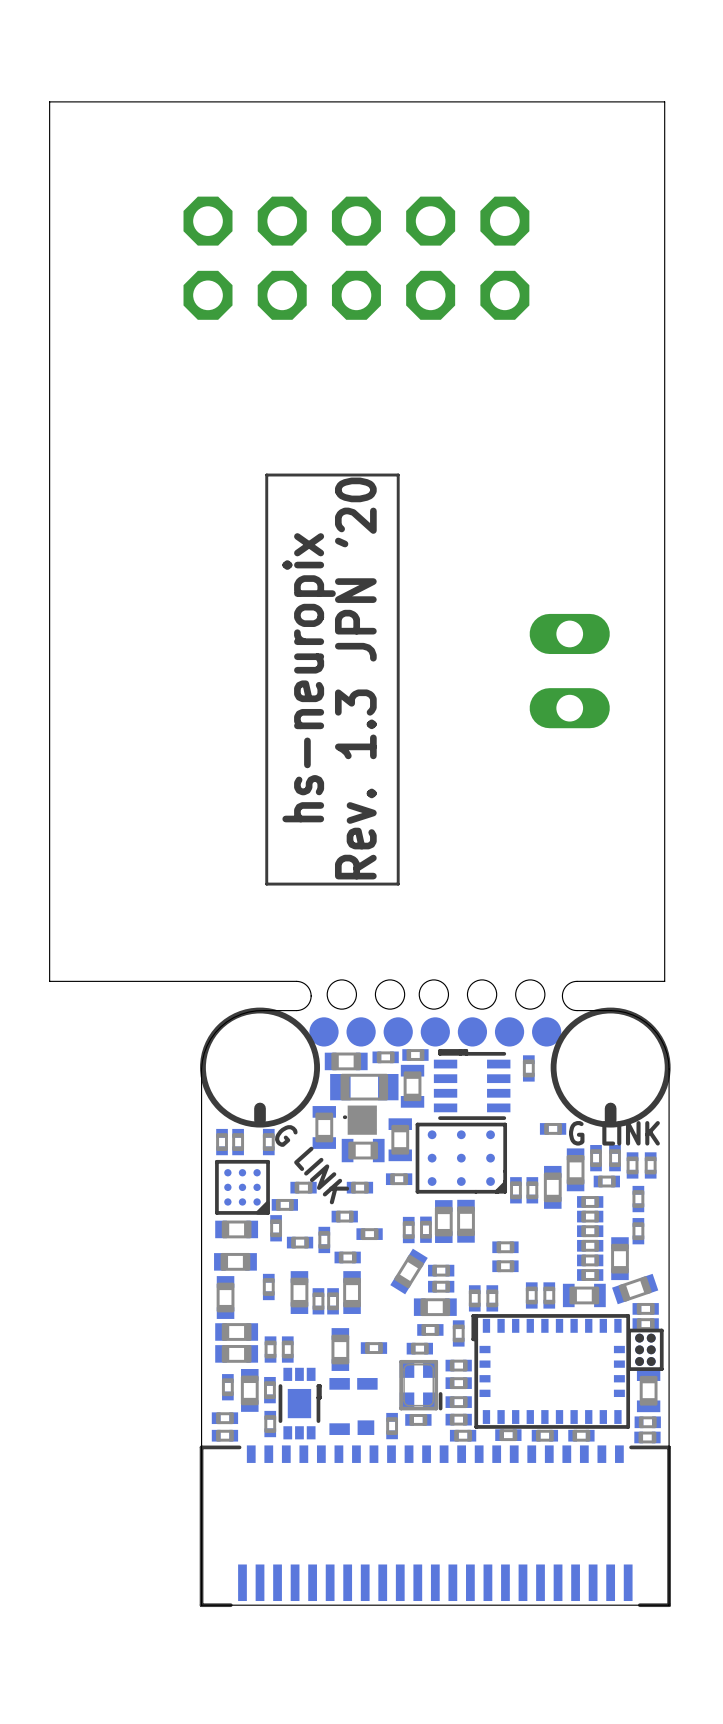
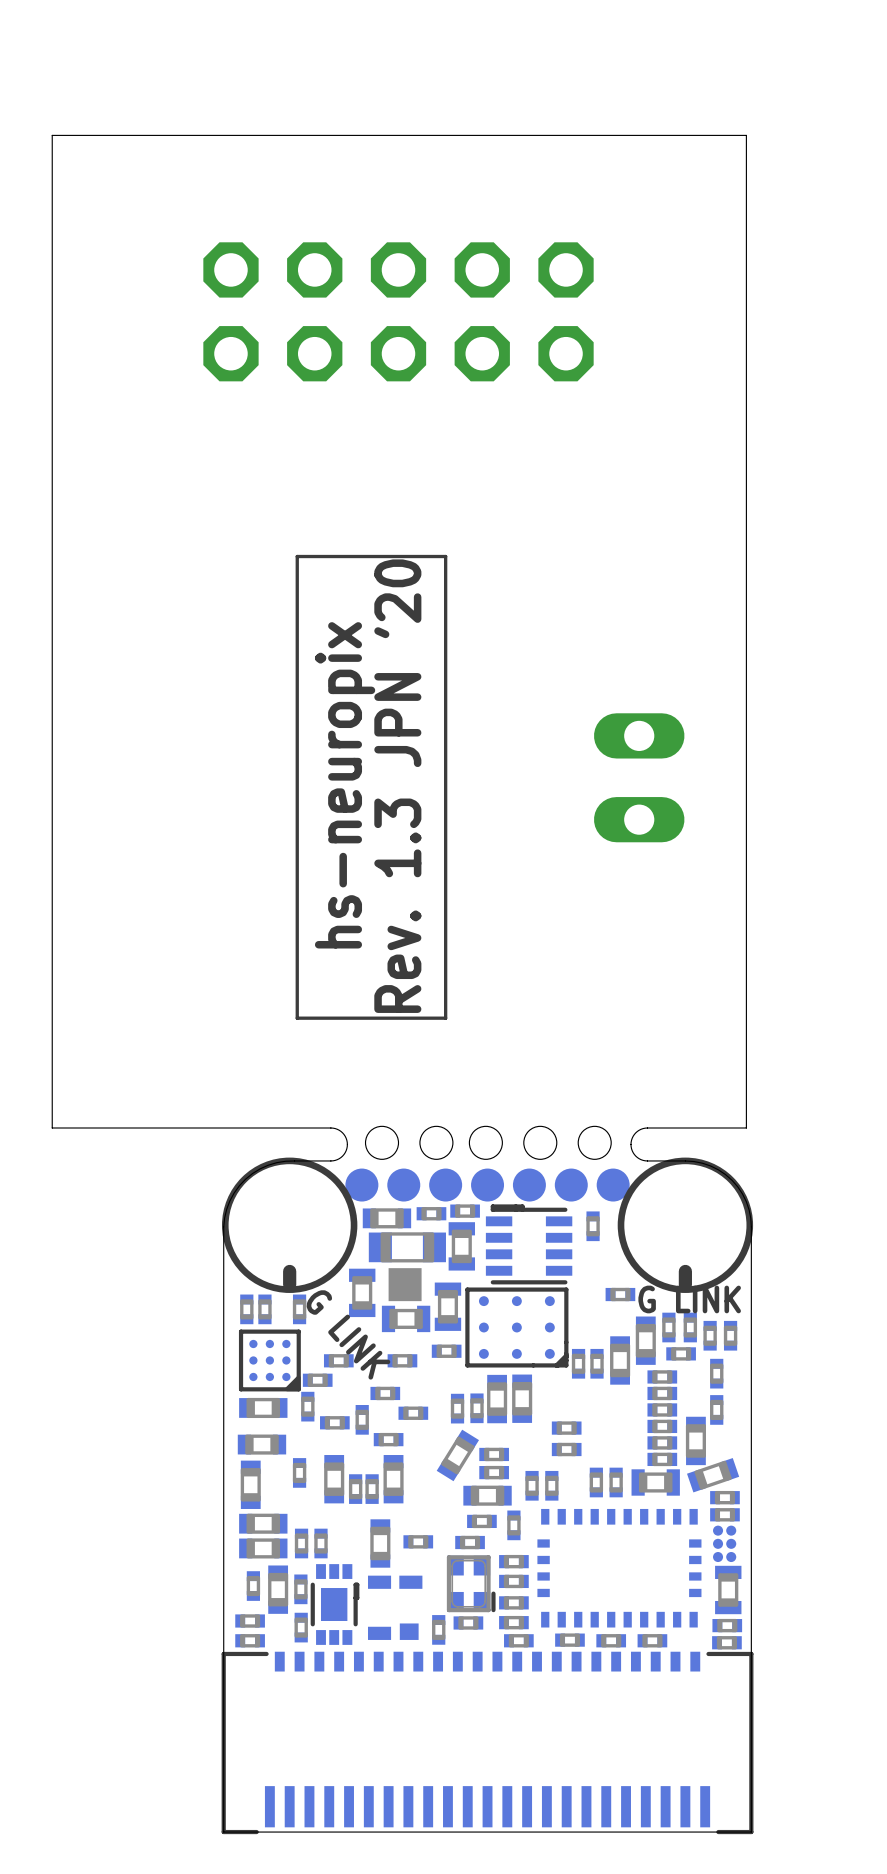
part footprint: [342, 1105, 377, 1135] -> [388, 1268, 422, 1302]
part footprint: [471, 1314, 631, 1429] -> [537, 1508, 702, 1628]
part footprint: [627, 1328, 664, 1371] -> [713, 1525, 737, 1563]

